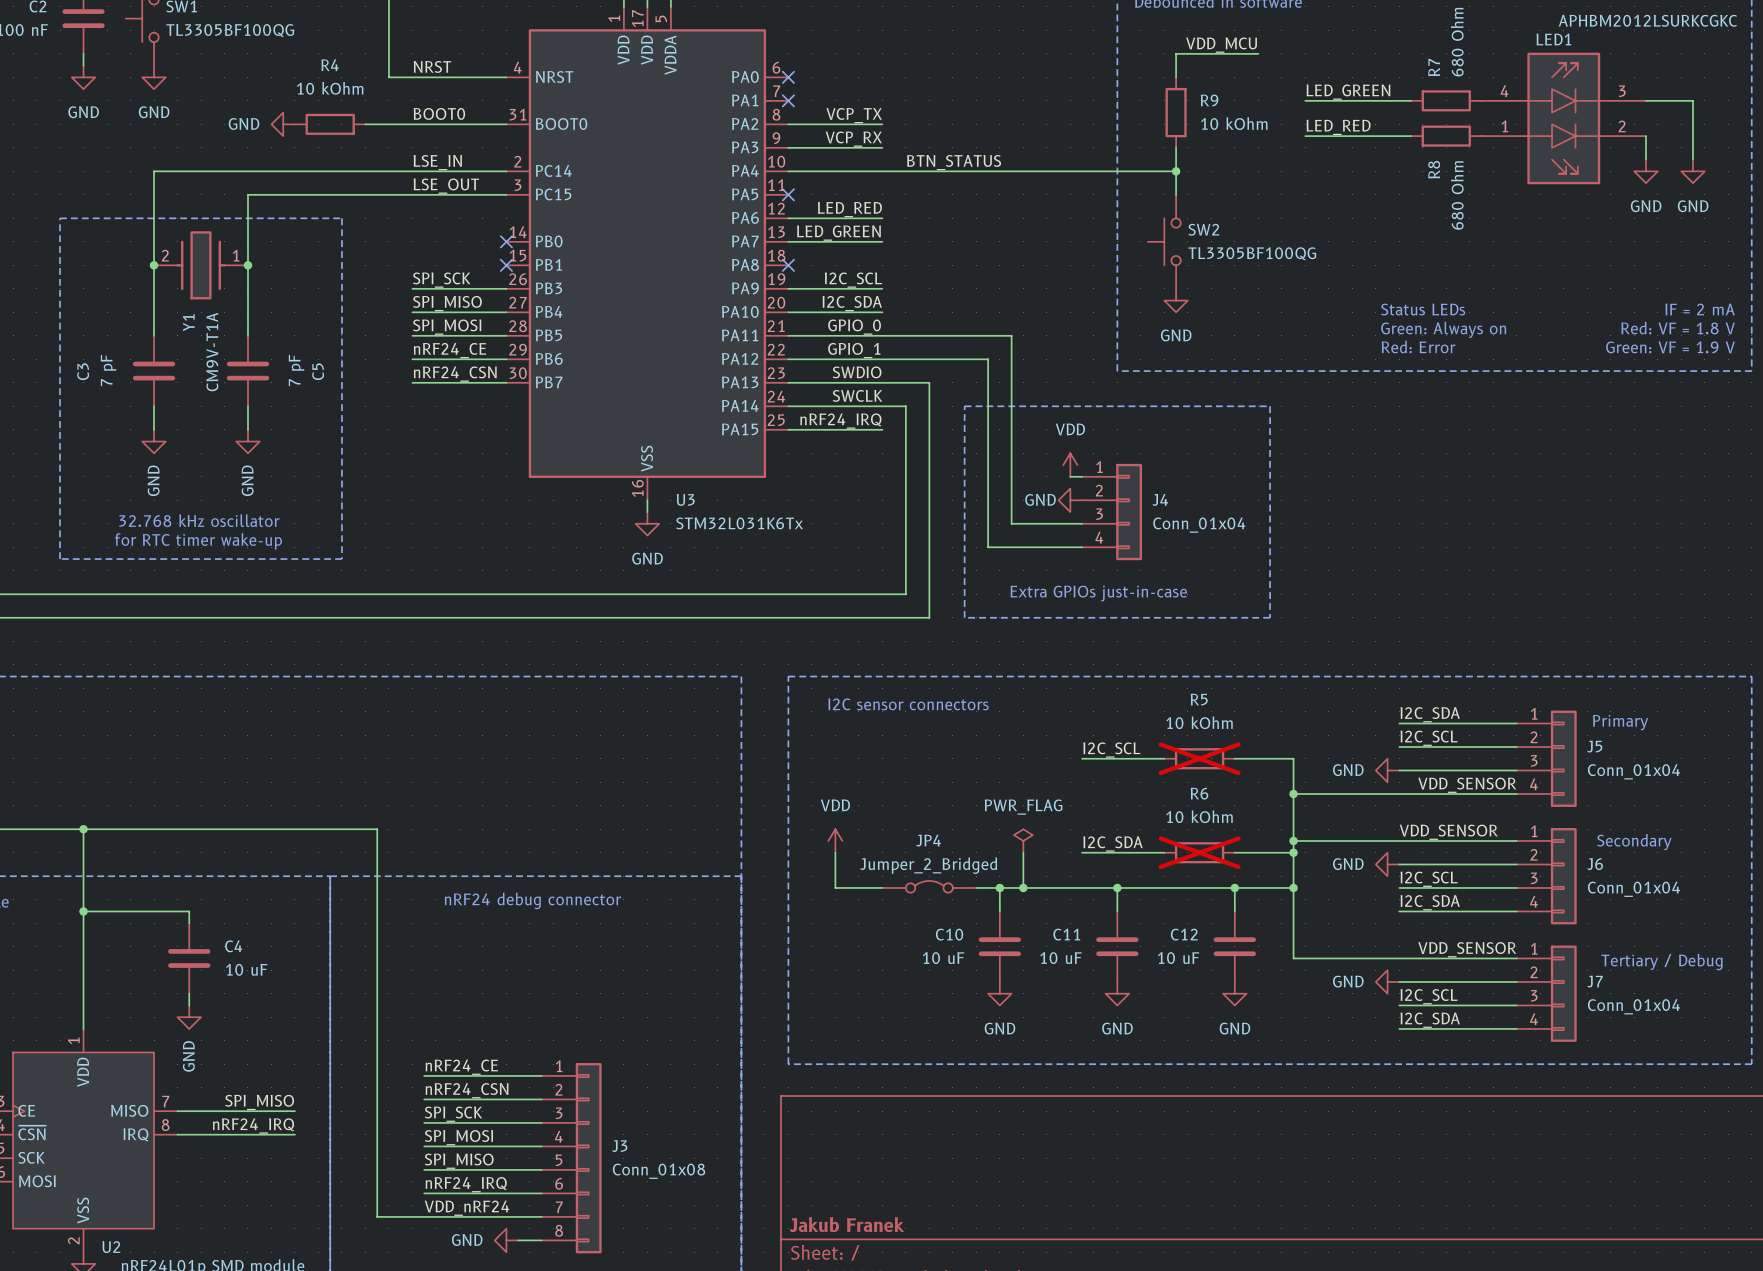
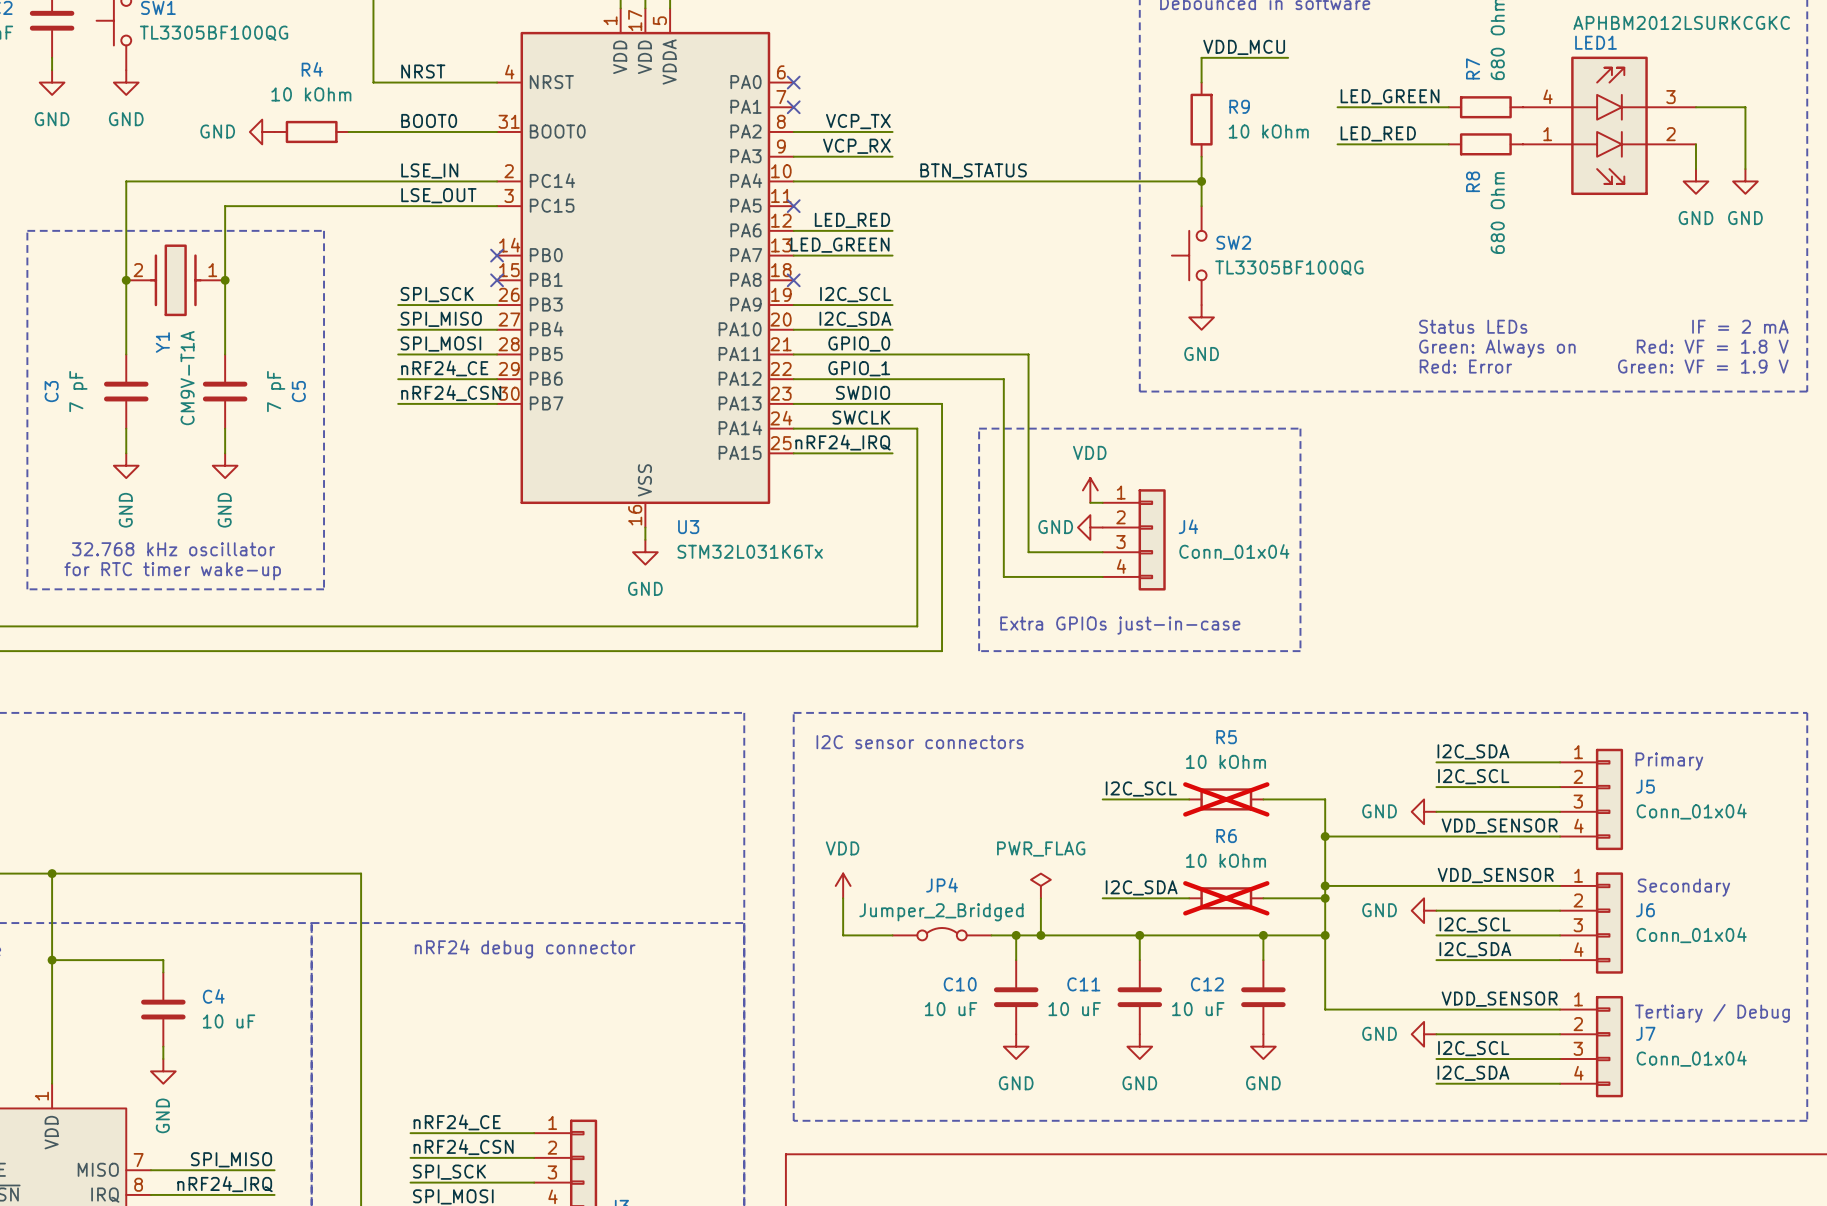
label position: I2C_SDA (1430, 714) -> I2C_SDA (1473, 751)
label position: I2C_SCL (1429, 738) -> I2C_SCL (1473, 776)
label position: I2C_SCL (1429, 996) -> I2C_SCL (1473, 1048)
label position: I2C_SDA (1430, 1020) -> I2C_SDA (1473, 1073)

